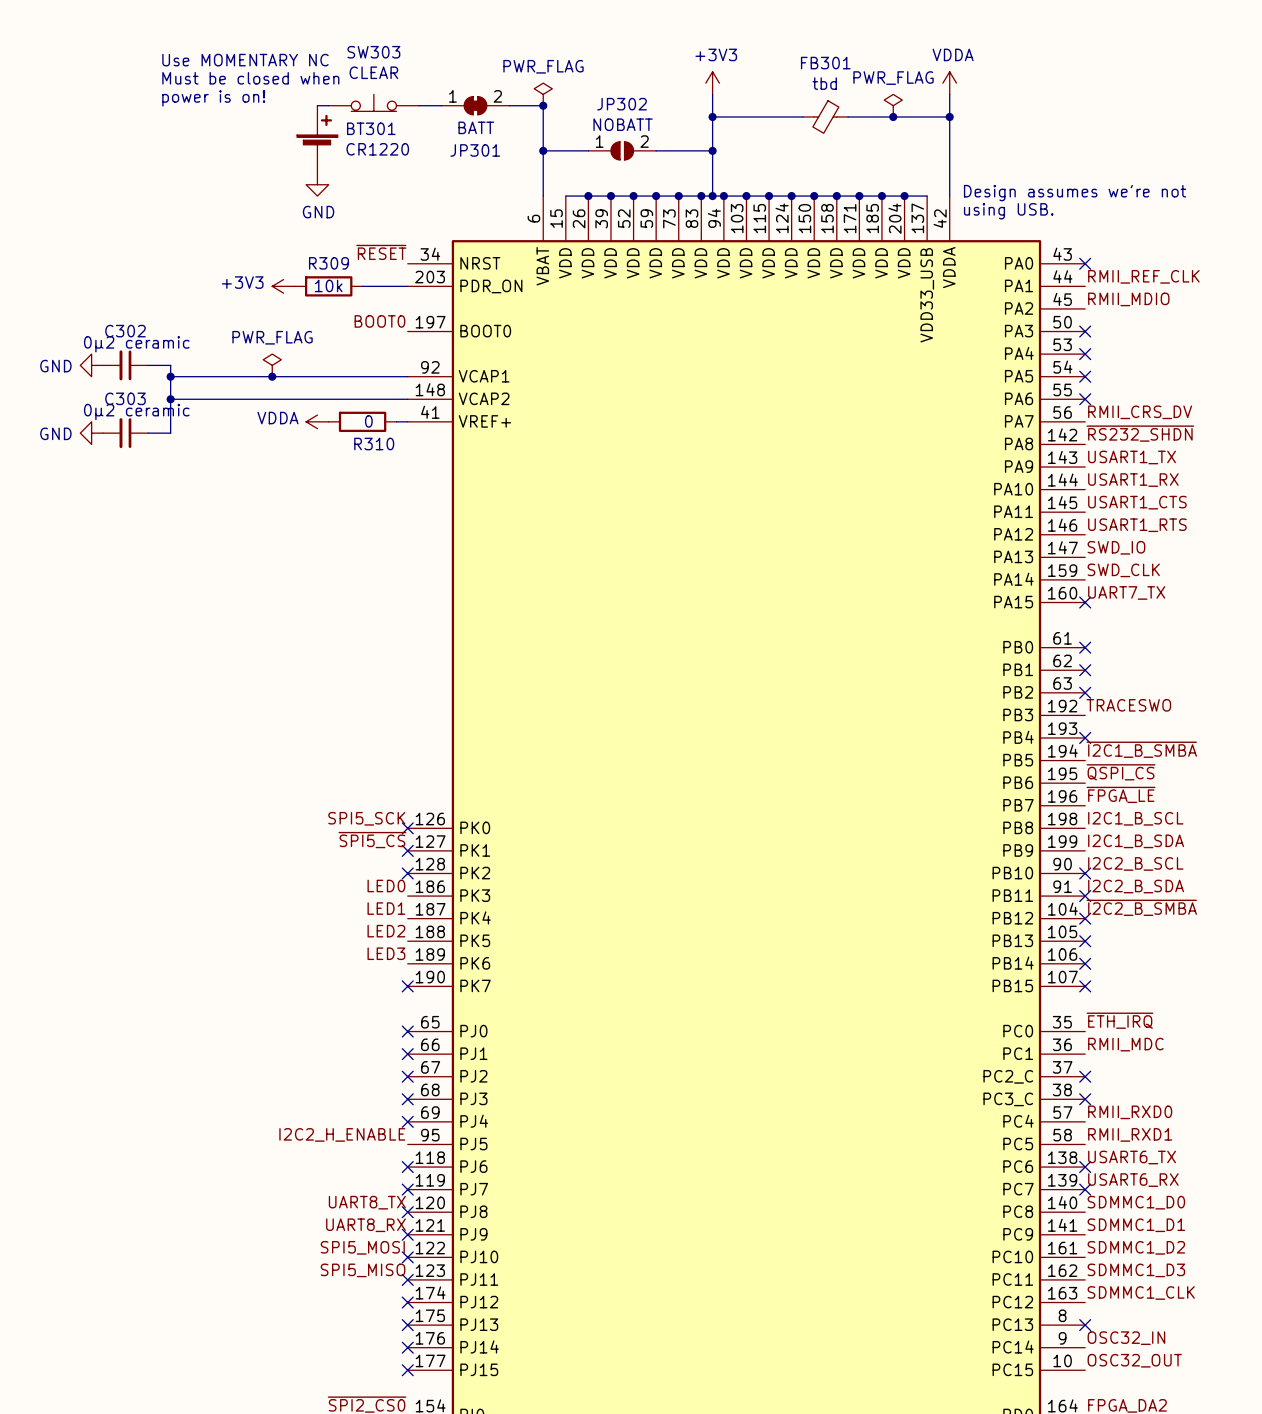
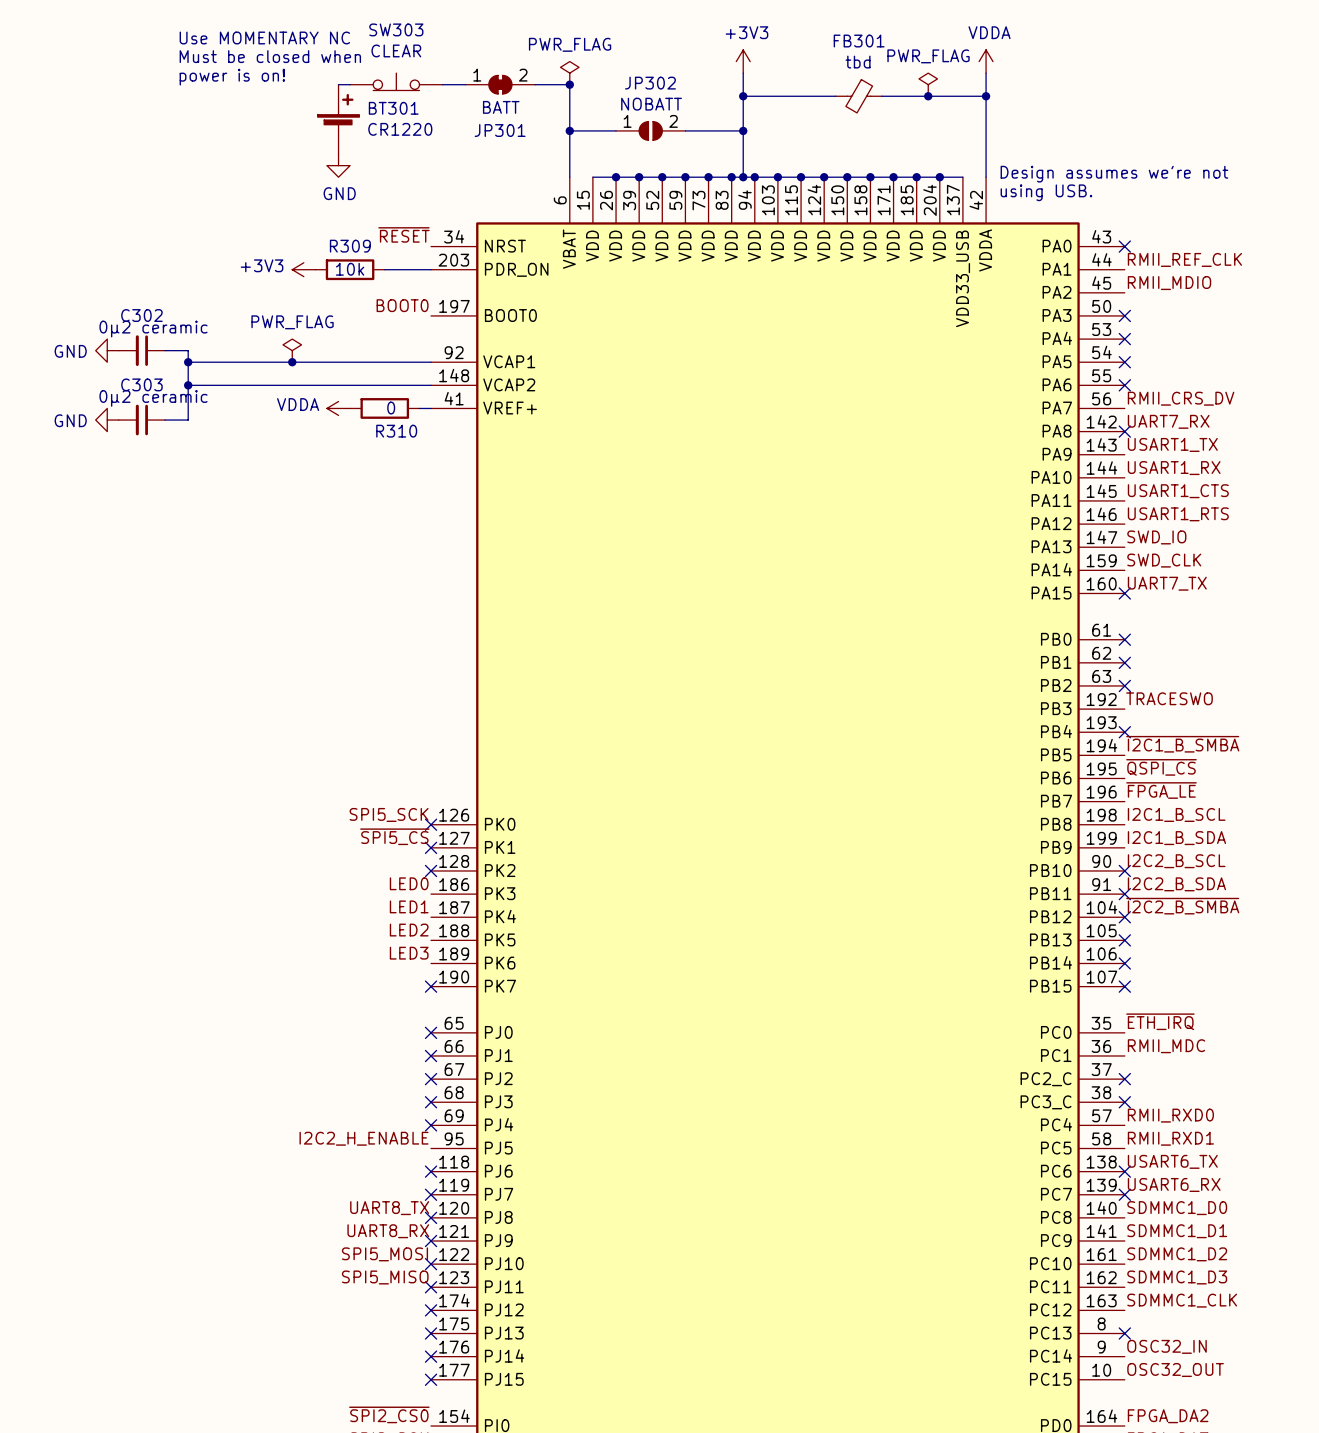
label: ~{RS232_SHDN} (1140, 433) -> UART7_RX (1168, 421)
no-connect mark: none -> (1124, 431)

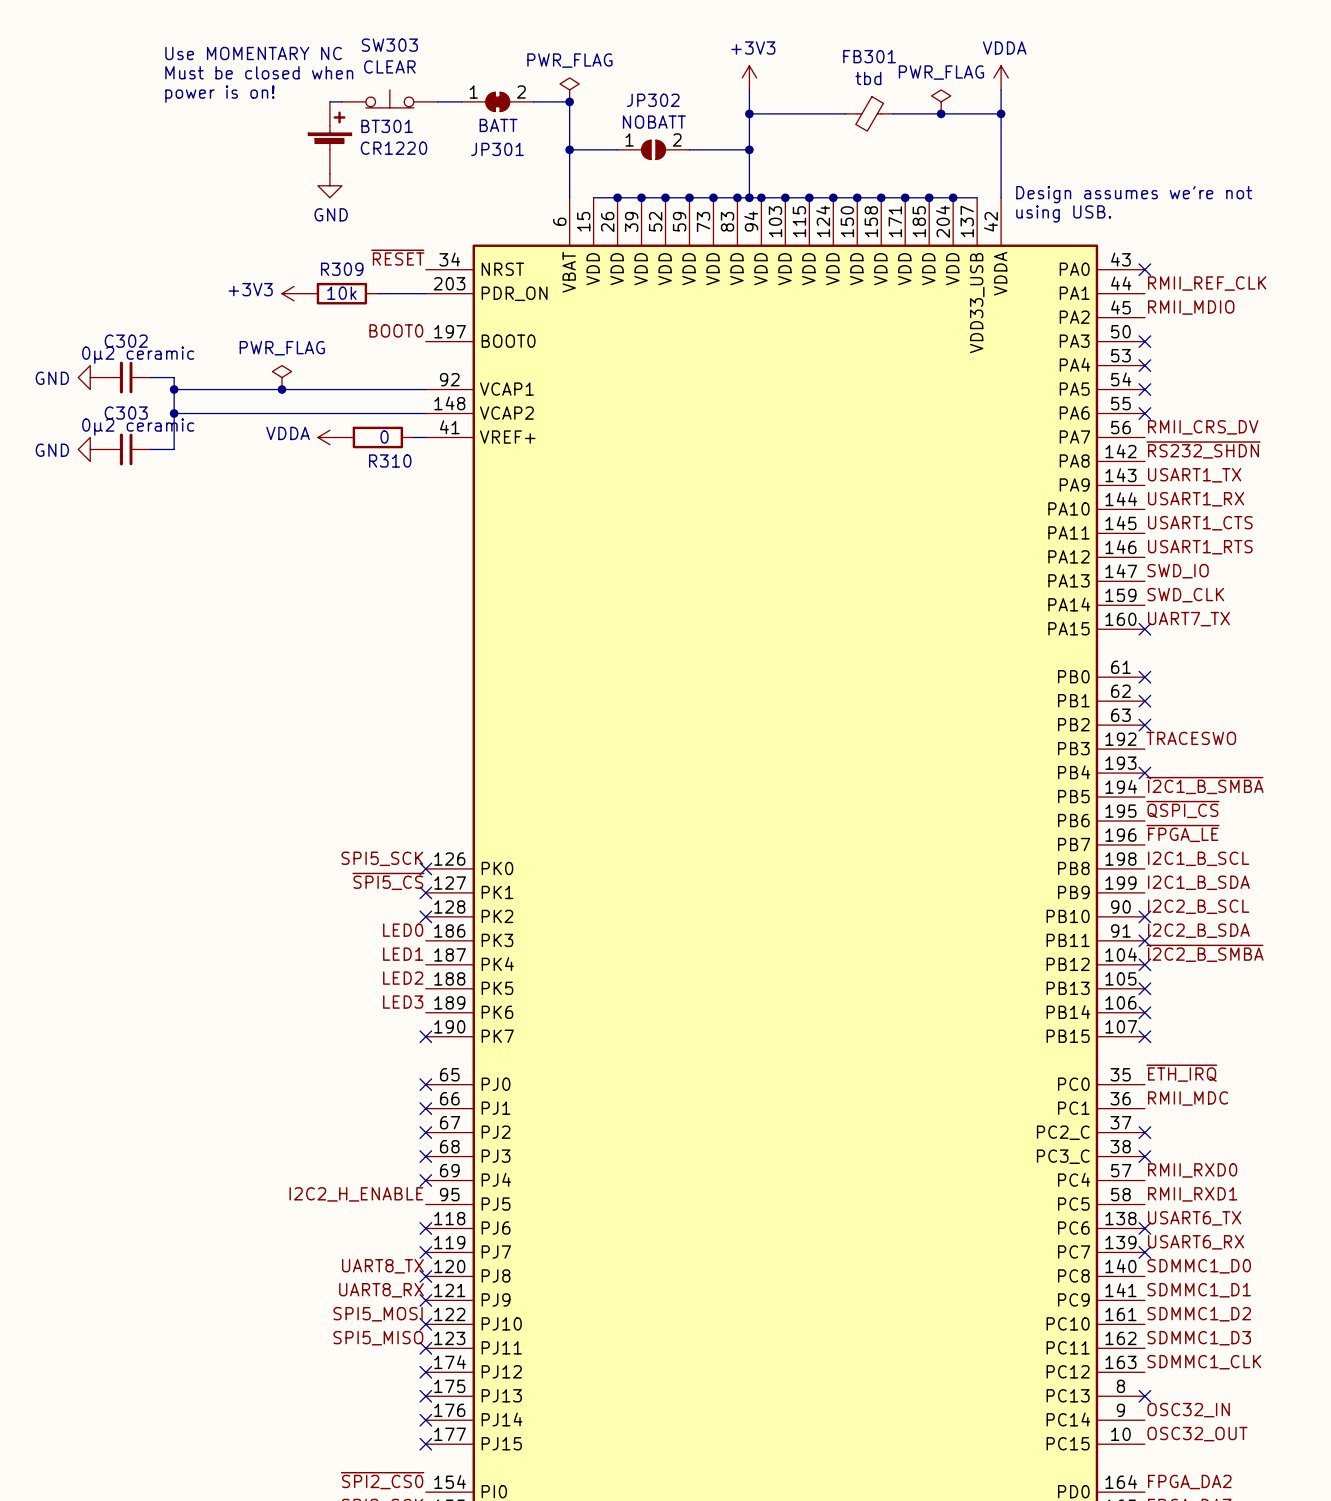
label: UART7_RX (1168, 421) -> ~{RS232_SHDN} (1203, 449)
no-connect mark: (1124, 431) -> none

